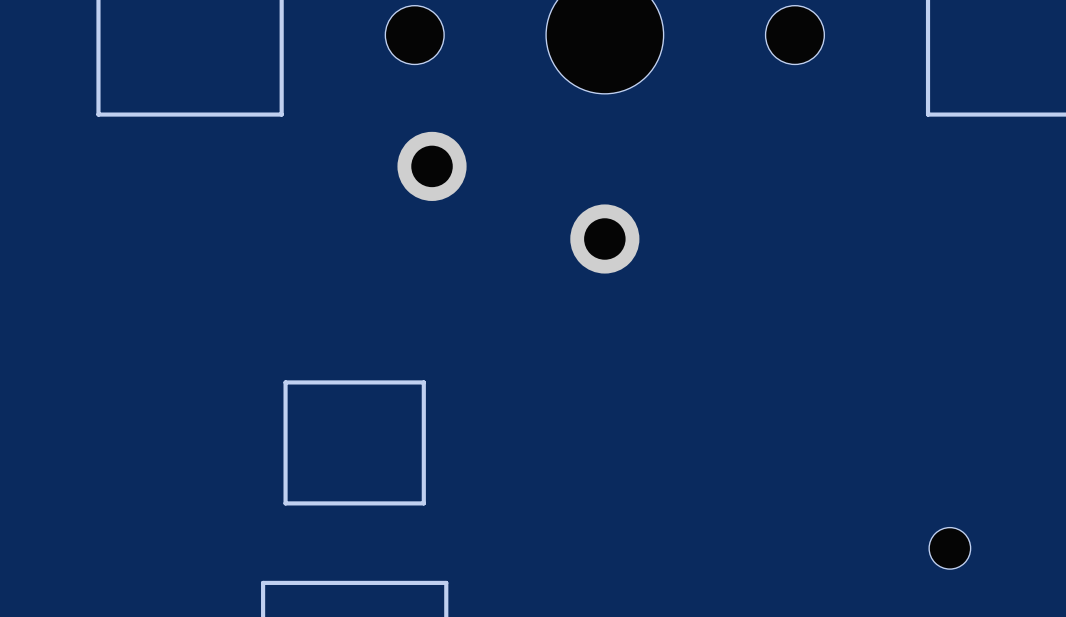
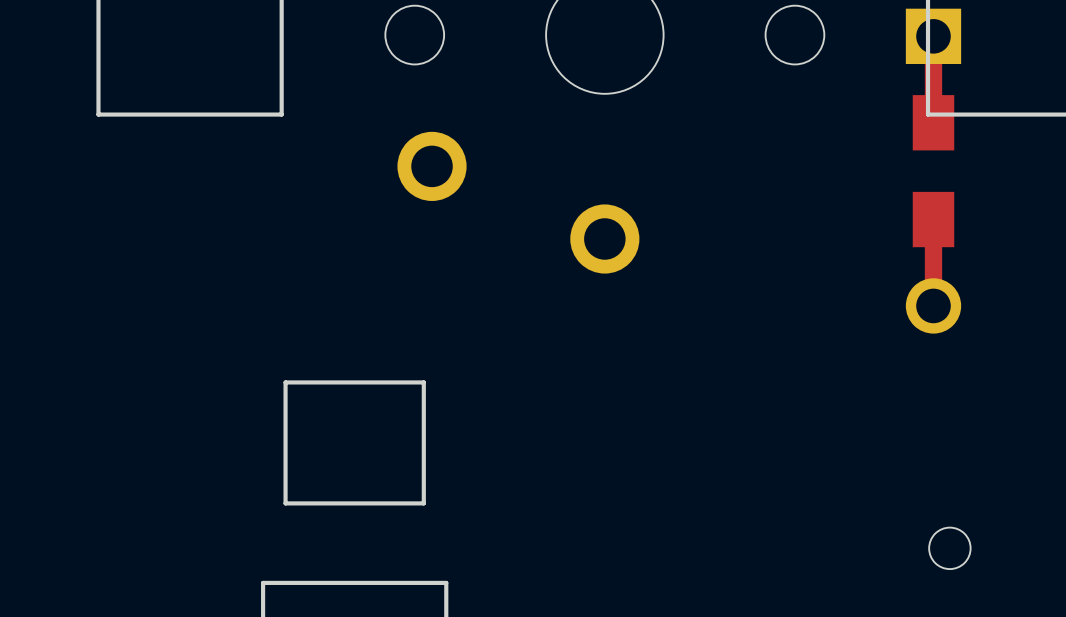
part: none -> (933, 171)

